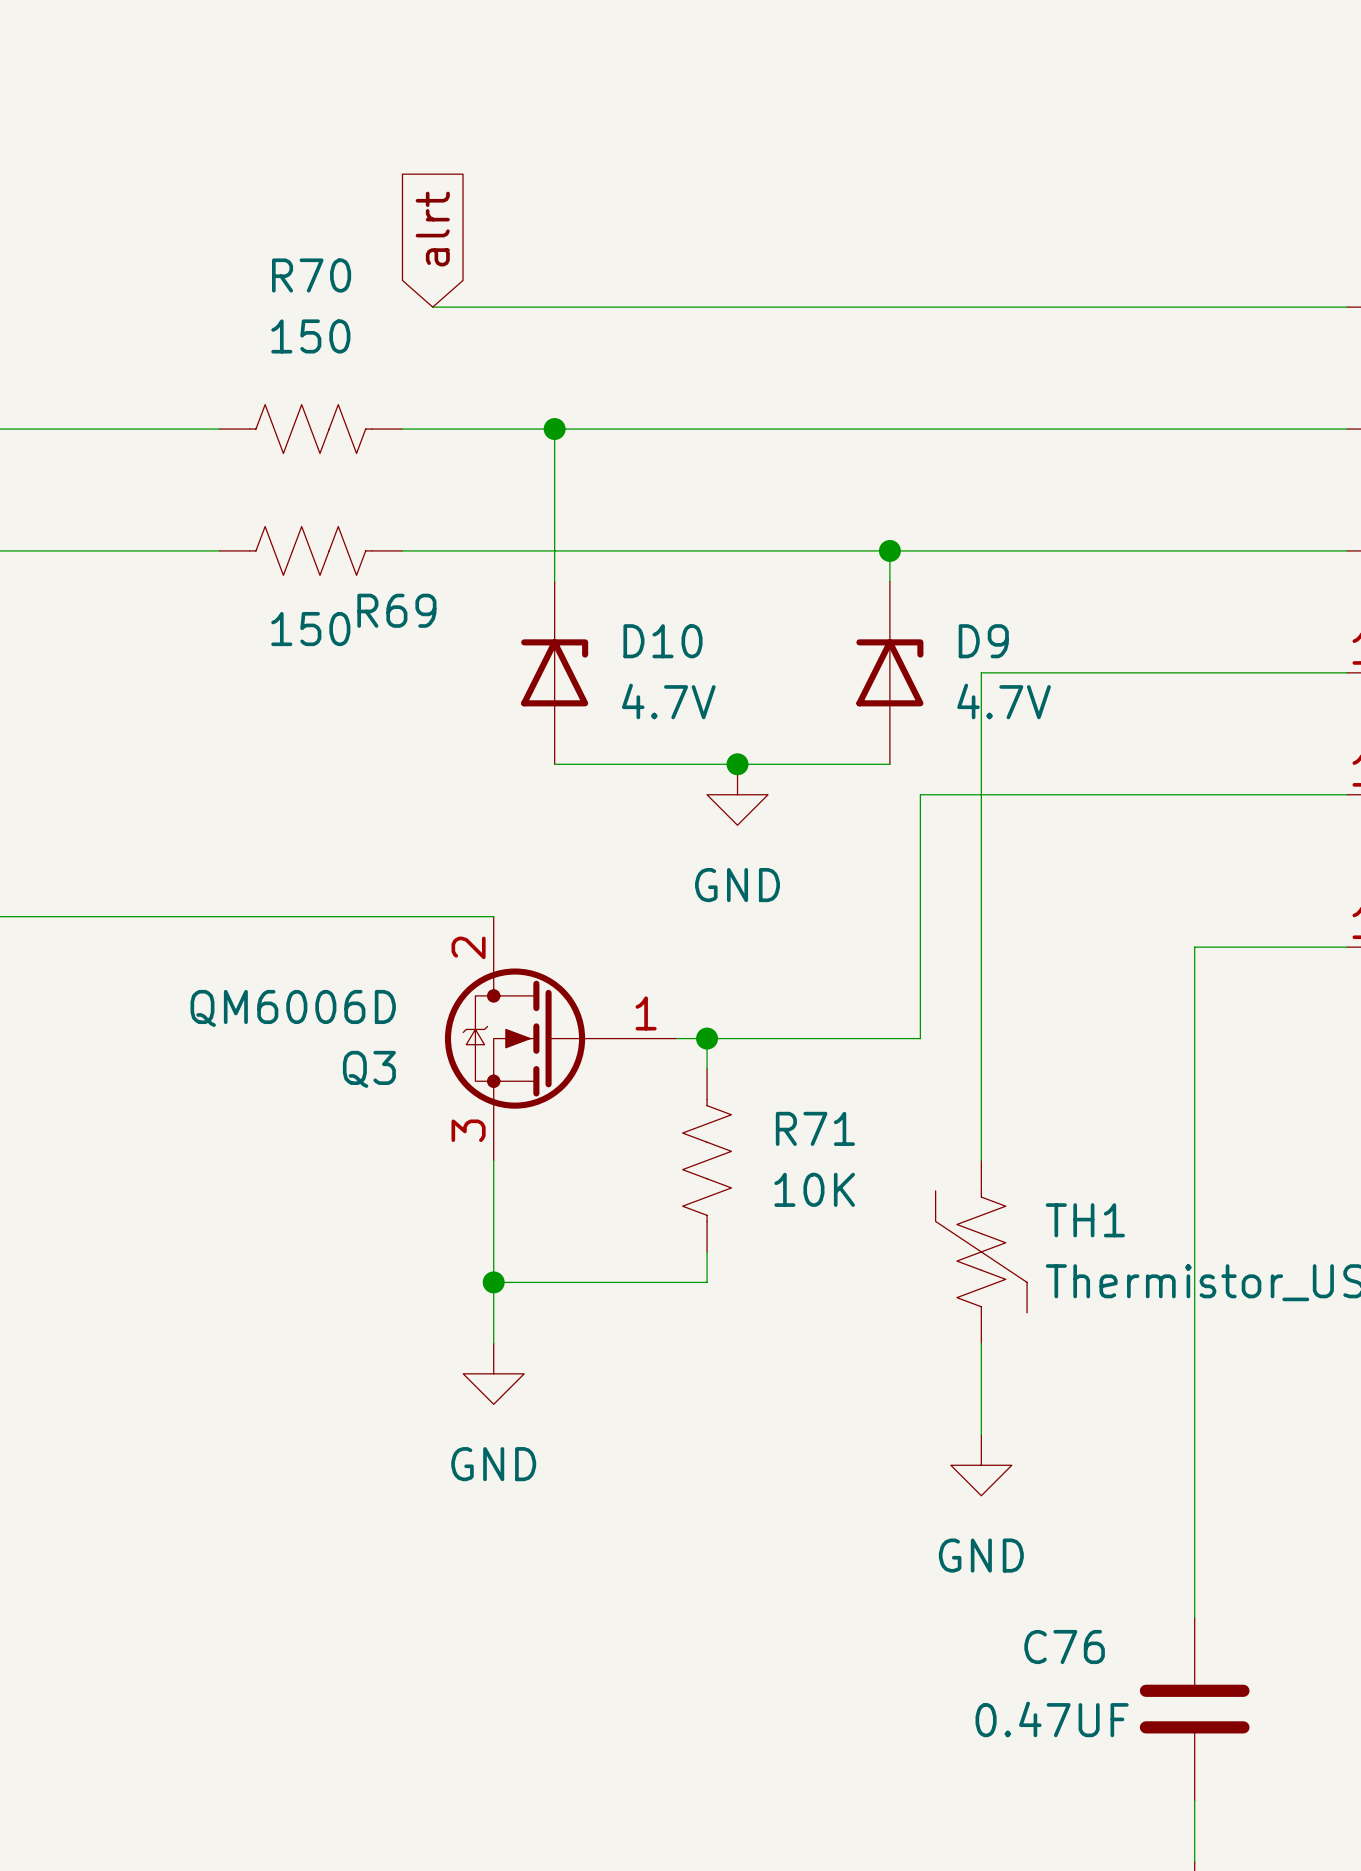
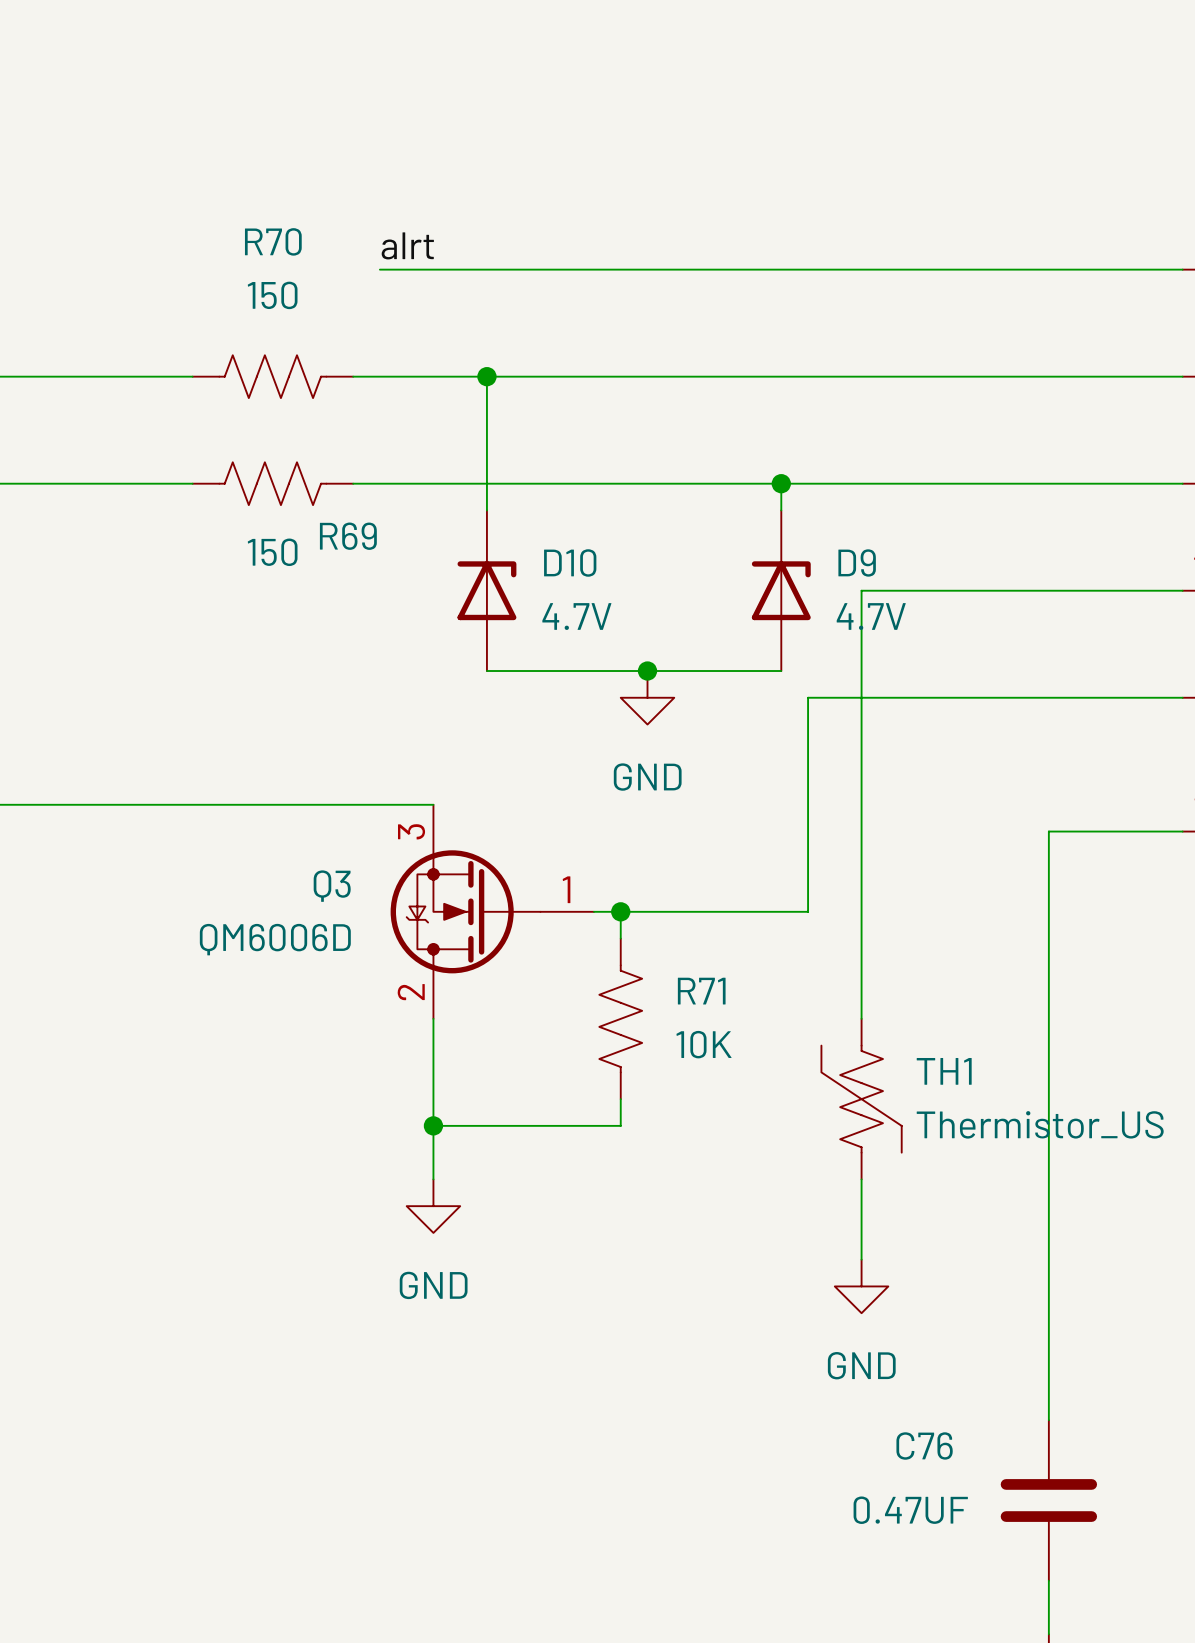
global label: alrt (432, 229) -> none
label: none -> alrt (407, 245)
Q3 flip: as is (530, 1038) -> up-down (465, 911)

